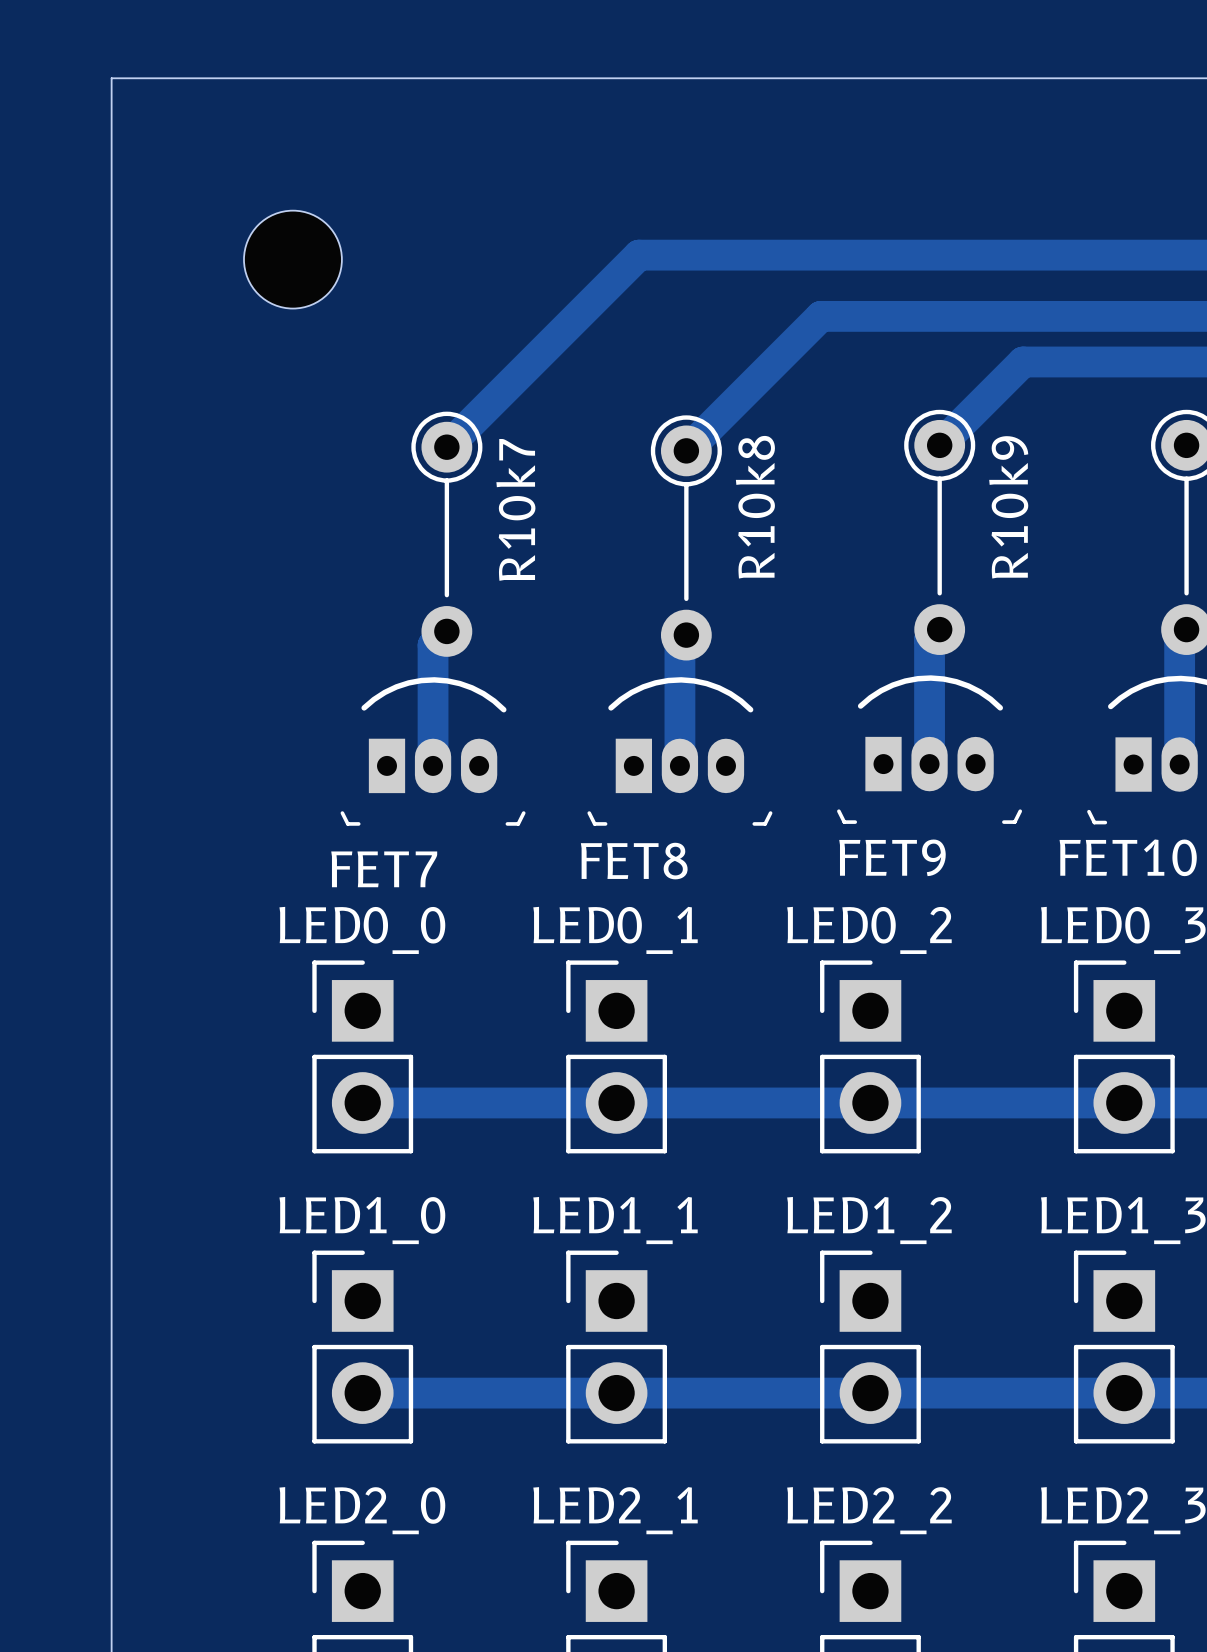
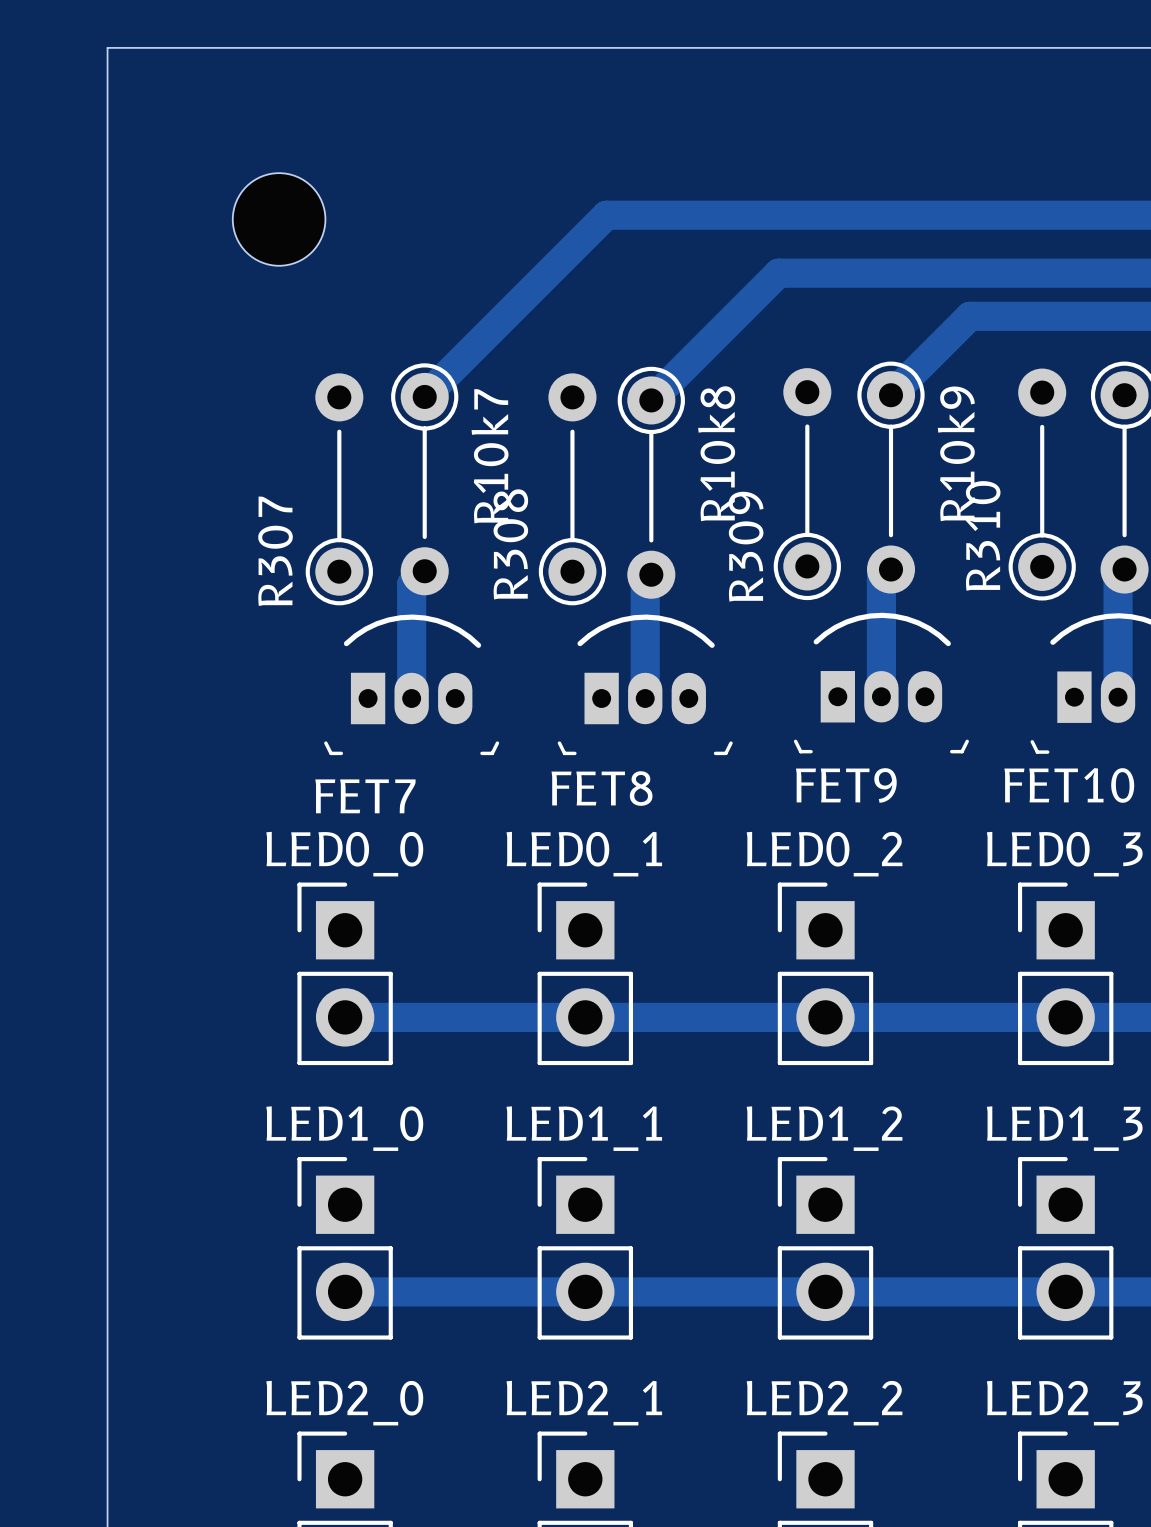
R309: none -> (807, 484)
R310: none -> (1042, 484)
R307: none -> (339, 489)
R308: none -> (572, 489)

